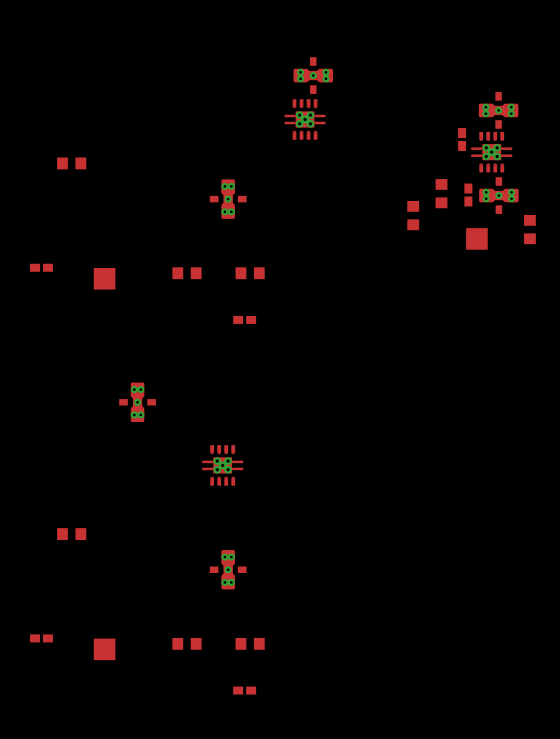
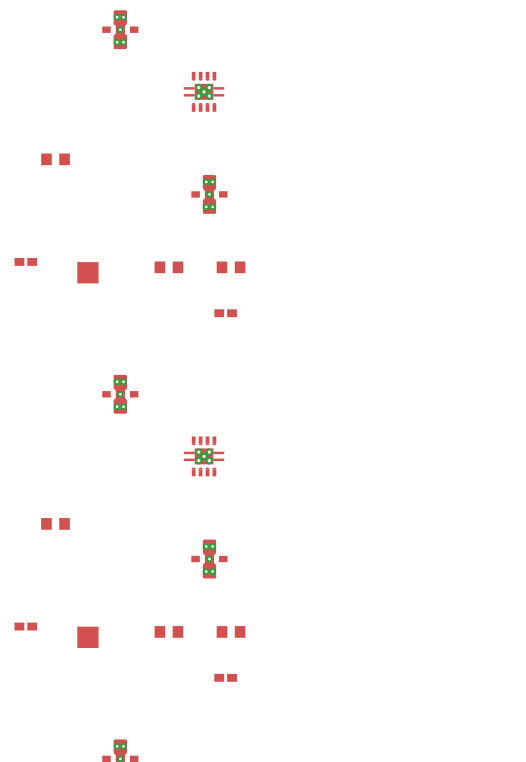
part rotation: 0° (313, 75) -> 90° clockwise (120, 29)
part position: (313, 75) -> (120, 29)
part: (498, 110) -> none
part position: (305, 119) -> (204, 91)
part: (462, 139) -> none
part: (491, 152) -> none
part: (441, 193) -> none
part: (468, 195) -> none
part: (498, 195) -> none
part: (413, 215) -> none
part: (529, 229) -> none
part: (476, 238) -> none

